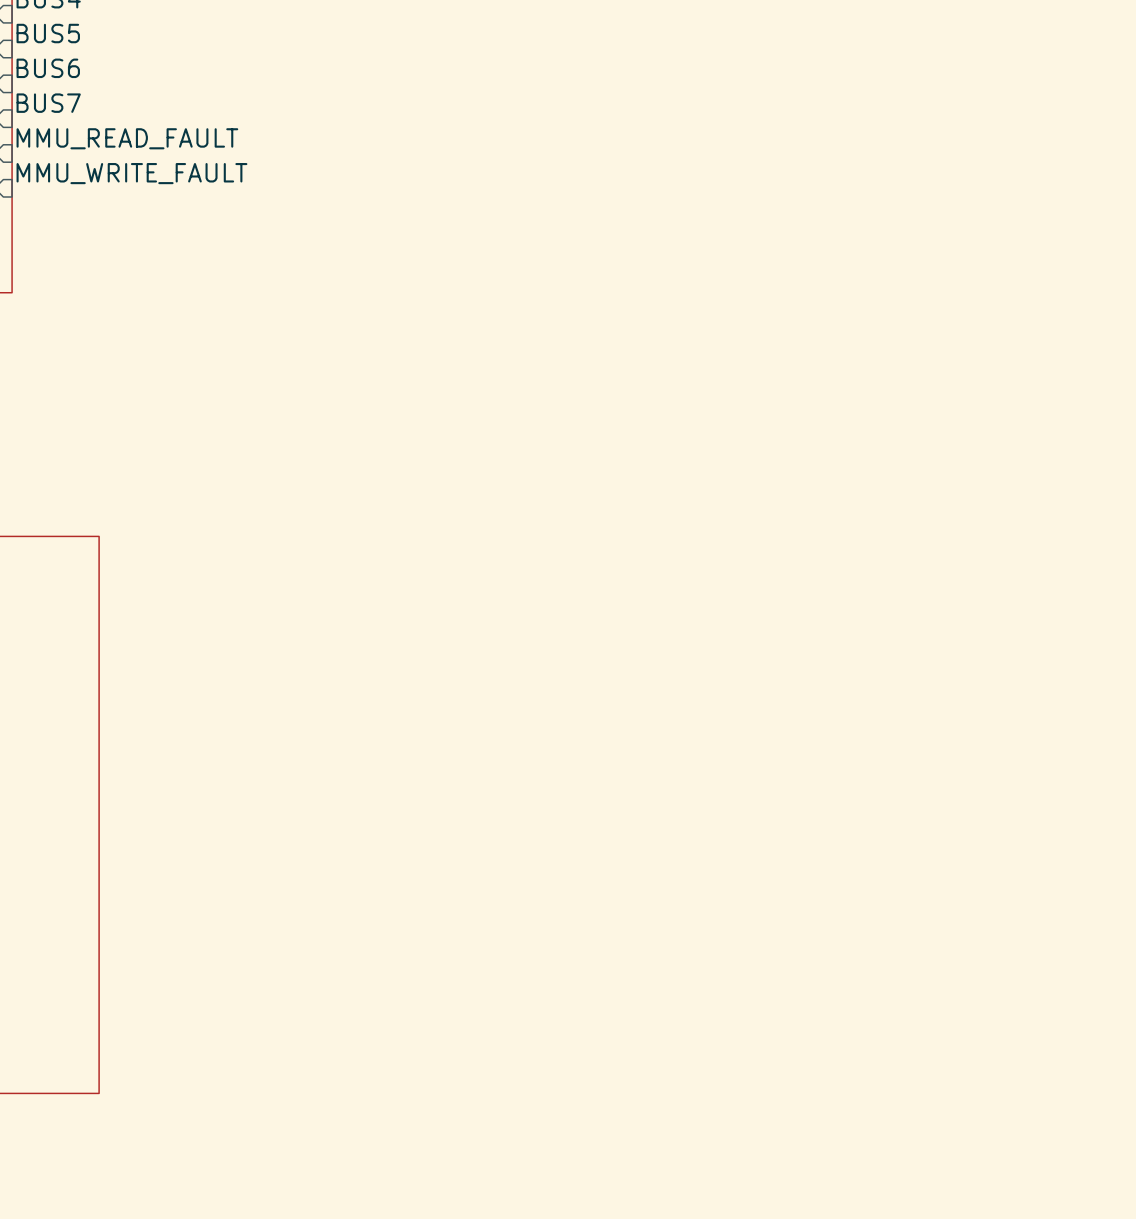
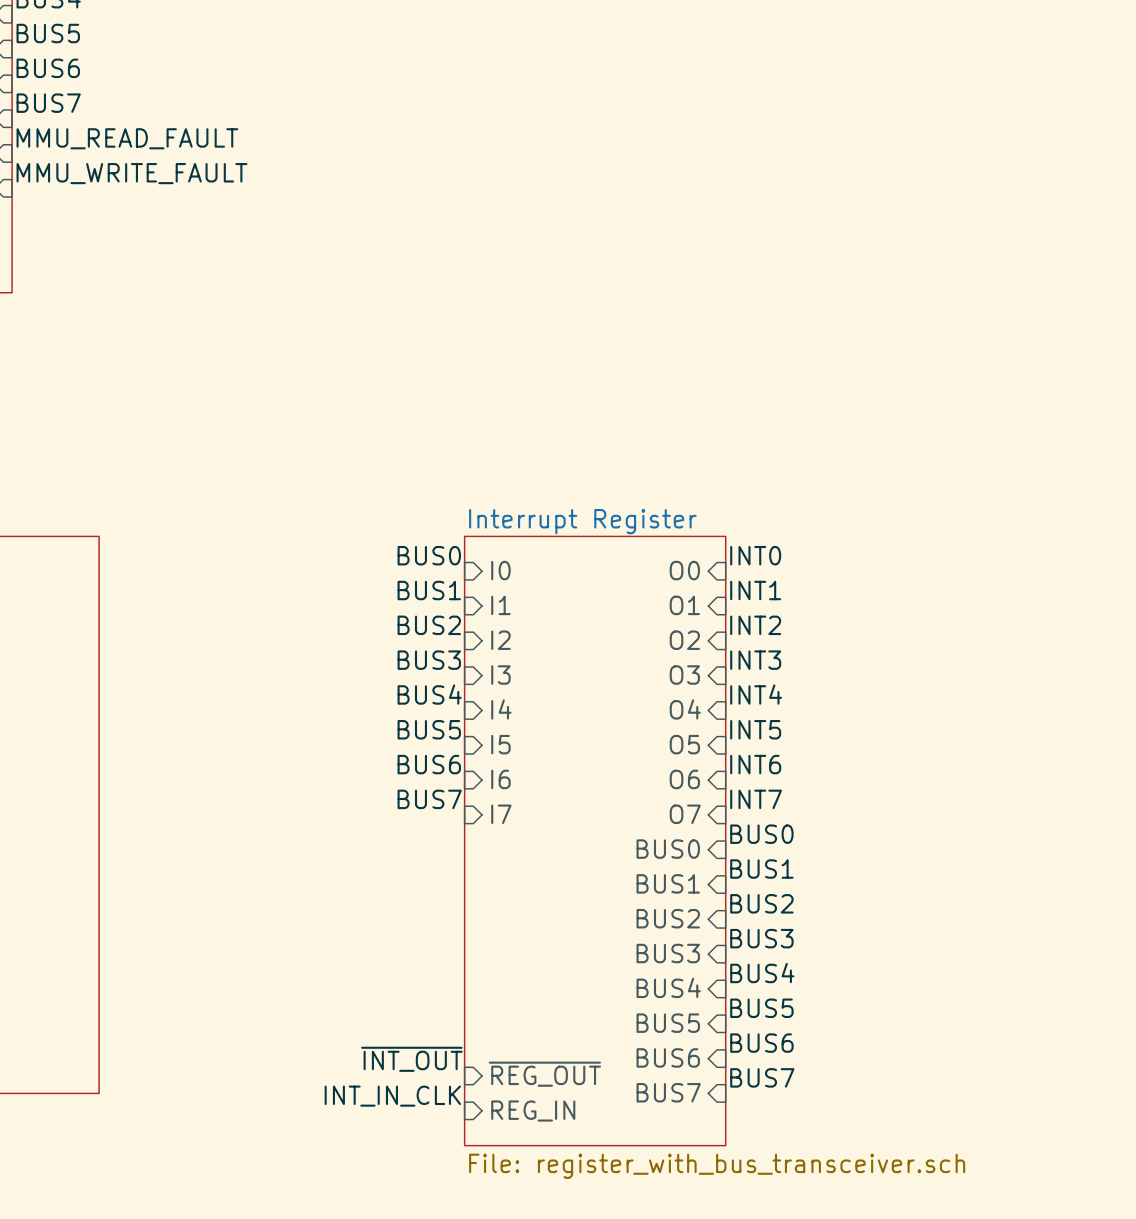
label: none -> BUS0 (429, 555)
label: none -> INT0 (755, 555)
sheet pin: none -> I0 (500, 570)
sheet pin: none -> O0 (684, 570)
label: none -> BUS1 (429, 590)
label: none -> INT1 (755, 590)
sheet pin: none -> I1 (500, 605)
sheet pin: none -> O1 (684, 605)
label: none -> BUS2 (429, 625)
label: none -> INT2 (755, 625)
sheet pin: none -> I2 (500, 640)
sheet pin: none -> O2 (684, 640)
label: none -> BUS3 (429, 660)
label: none -> INT3 (755, 660)
sheet pin: none -> I3 (500, 675)
sheet pin: none -> O3 (684, 675)
label: none -> BUS4 (429, 694)
label: none -> INT4 (756, 694)
sheet pin: none -> I4 (501, 709)
sheet pin: none -> O4 (685, 709)
label: none -> BUS5 (429, 729)
label: none -> INT5 (755, 729)
sheet pin: none -> I5 (500, 744)
sheet pin: none -> O5 (684, 744)
label: none -> BUS6 (429, 764)
label: none -> INT6 (755, 764)
sheet pin: none -> I6 (500, 779)
sheet pin: none -> O6 (684, 779)
label: none -> BUS7 (429, 799)
label: none -> INT7 (756, 799)
sheet pin: none -> I7 (501, 814)
sheet pin: none -> O7 (685, 814)
label: none -> BUS0 (761, 834)
sheet Interrupt Register: none -> File: register_with_bus_transceiver.sch (595, 841)
sheet pin: none -> BUS0 (668, 849)
label: none -> BUS1 (761, 869)
sheet pin: none -> BUS1 (668, 883)
label: none -> BUS2 (761, 903)
sheet pin: none -> BUS2 (668, 918)
label: none -> BUS3 (761, 938)
sheet pin: none -> BUS3 (668, 953)
label: none -> BUS4 (762, 973)
sheet pin: none -> BUS4 (668, 987)
label: none -> BUS5 (761, 1008)
sheet pin: none -> BUS5 (668, 1023)
label: none -> BUS6 (761, 1043)
sheet pin: none -> BUS6 (668, 1057)
label: none -> ~{INT_OUT} (411, 1059)
sheet pin: none -> ~{REG_OUT} (544, 1074)
label: none -> BUS7 (762, 1077)
sheet pin: none -> BUS7 (668, 1092)
label: none -> INT_IN_CLK (392, 1096)
sheet pin: none -> REG_IN (533, 1111)

